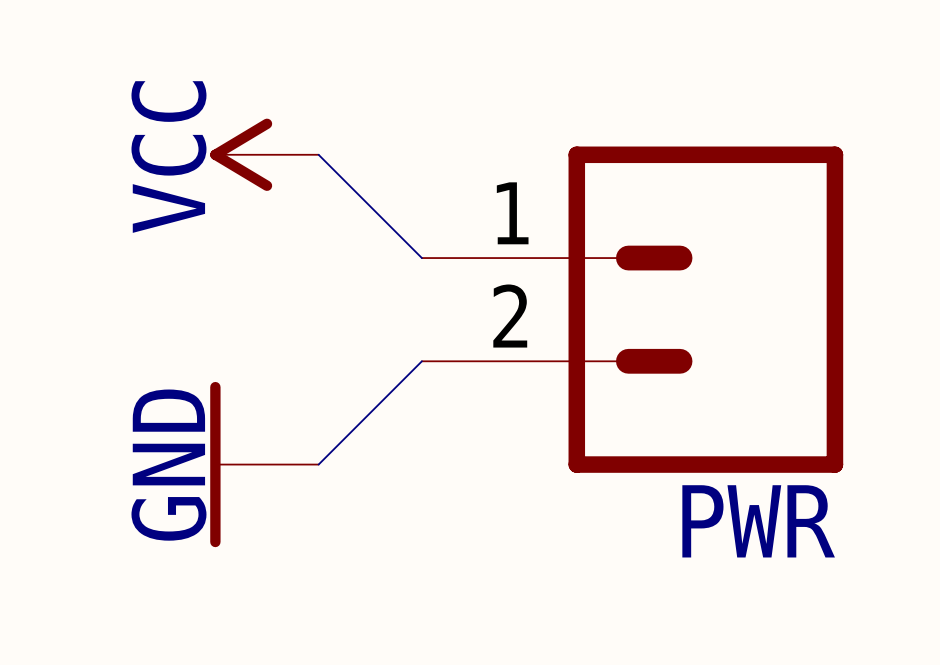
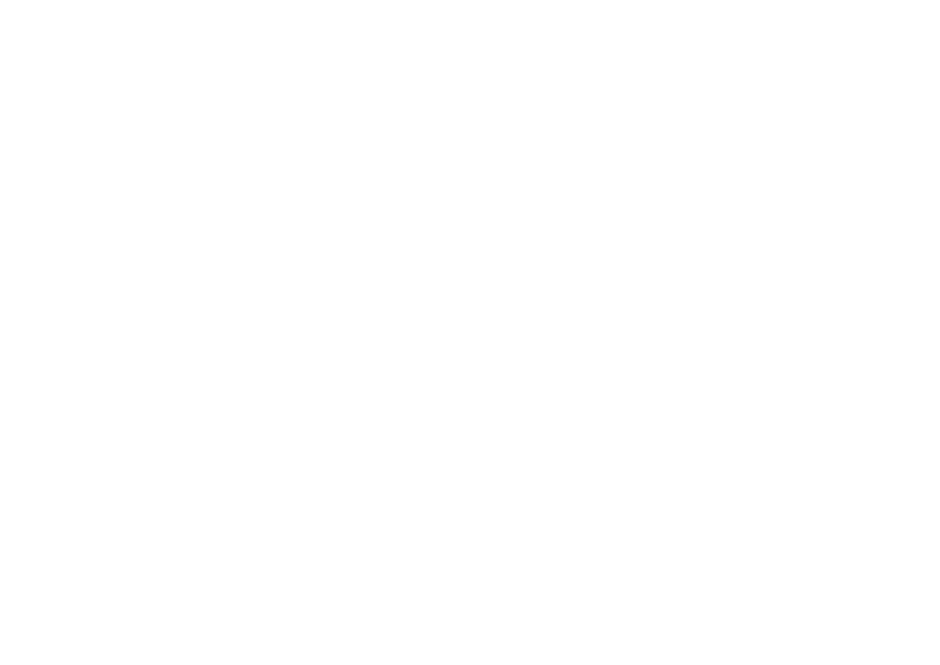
power symbol: VCC (264, 154) -> none
wire: (318, 154) (421, 258) -> none
PWR: (632, 309) -> none
wire: (421, 361) (318, 464) -> none
power symbol: GND (264, 464) -> none

